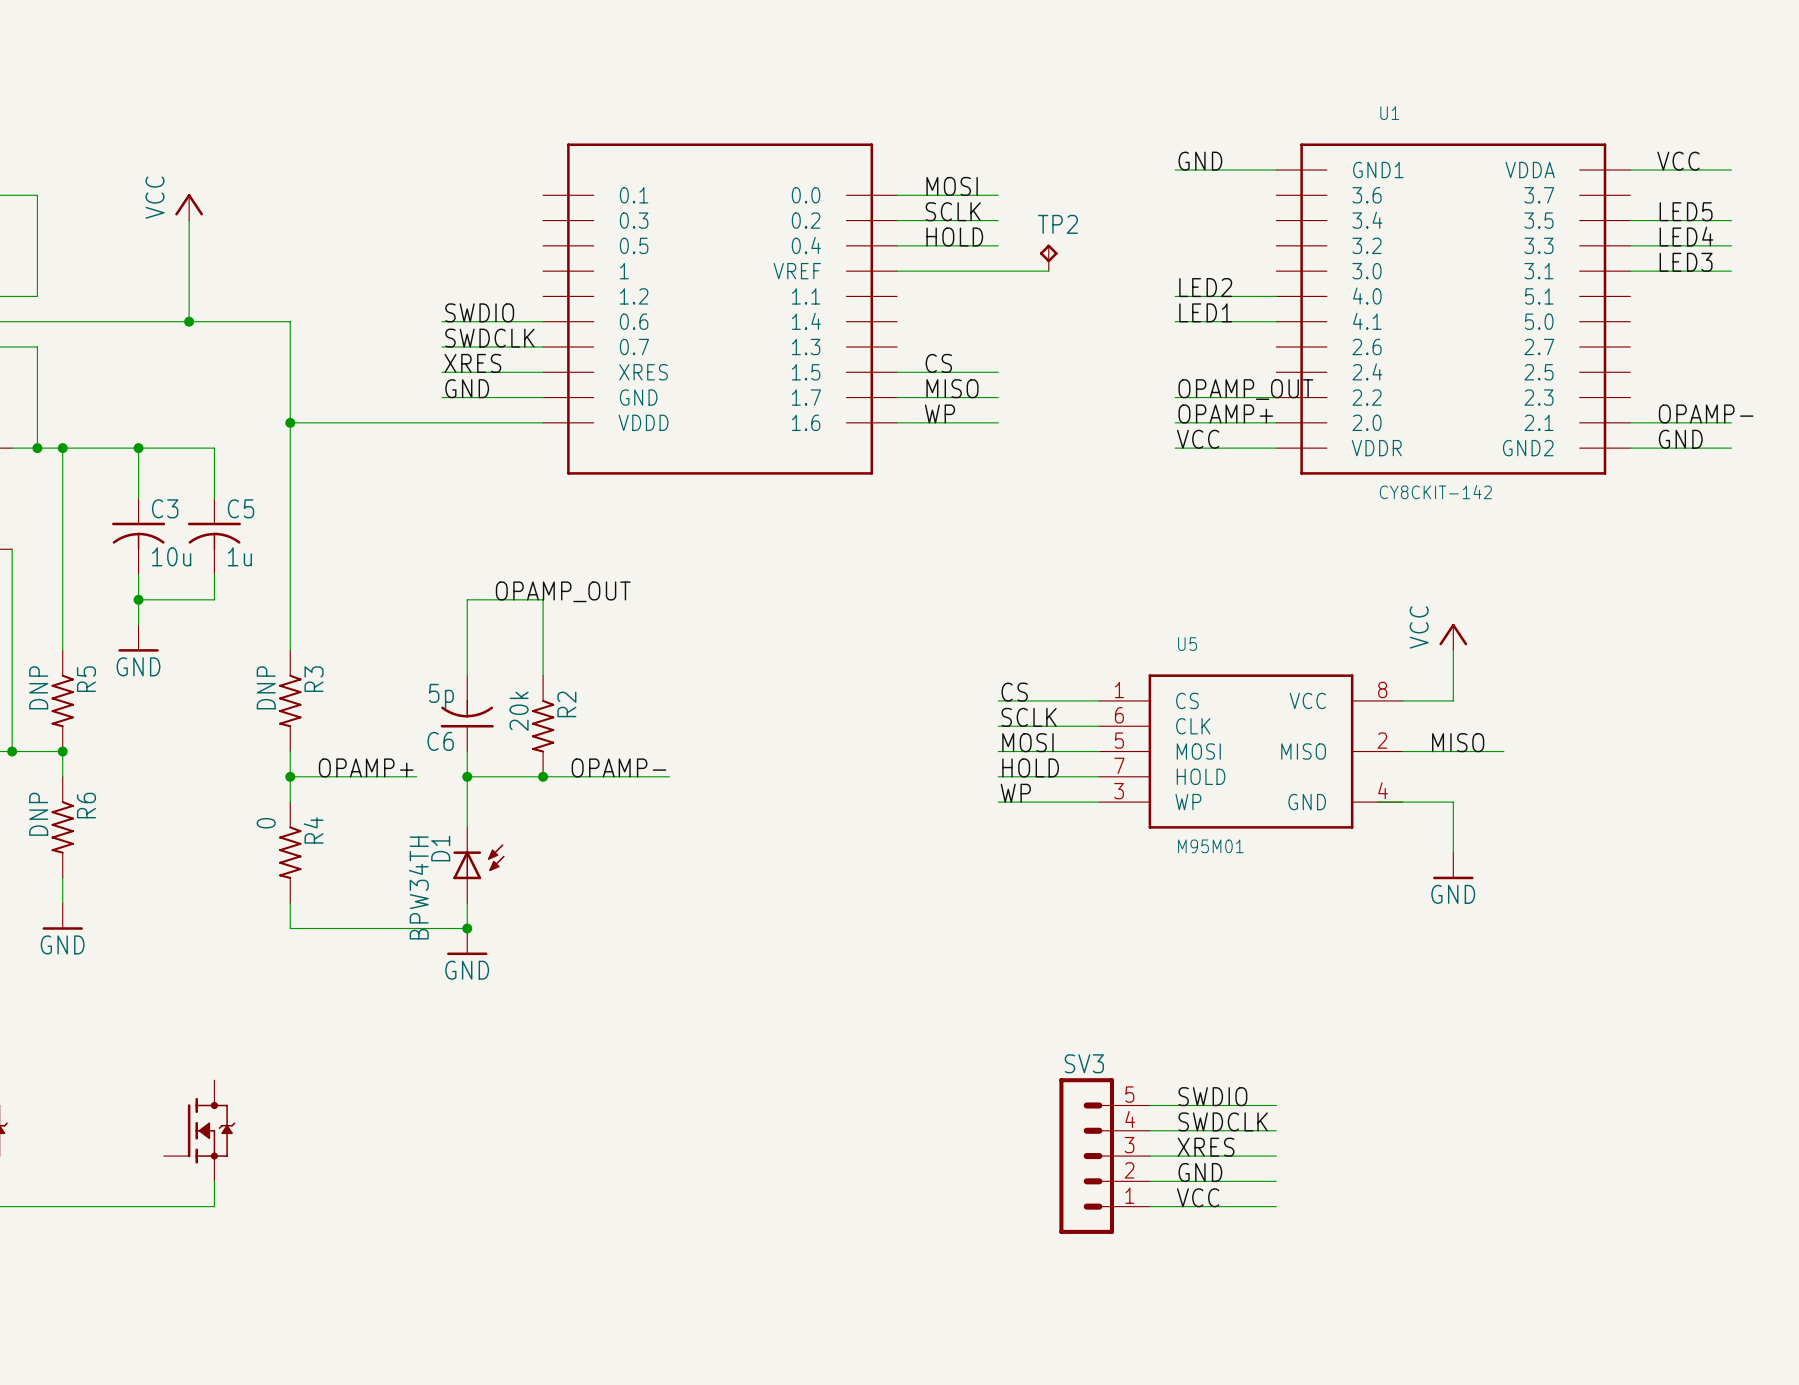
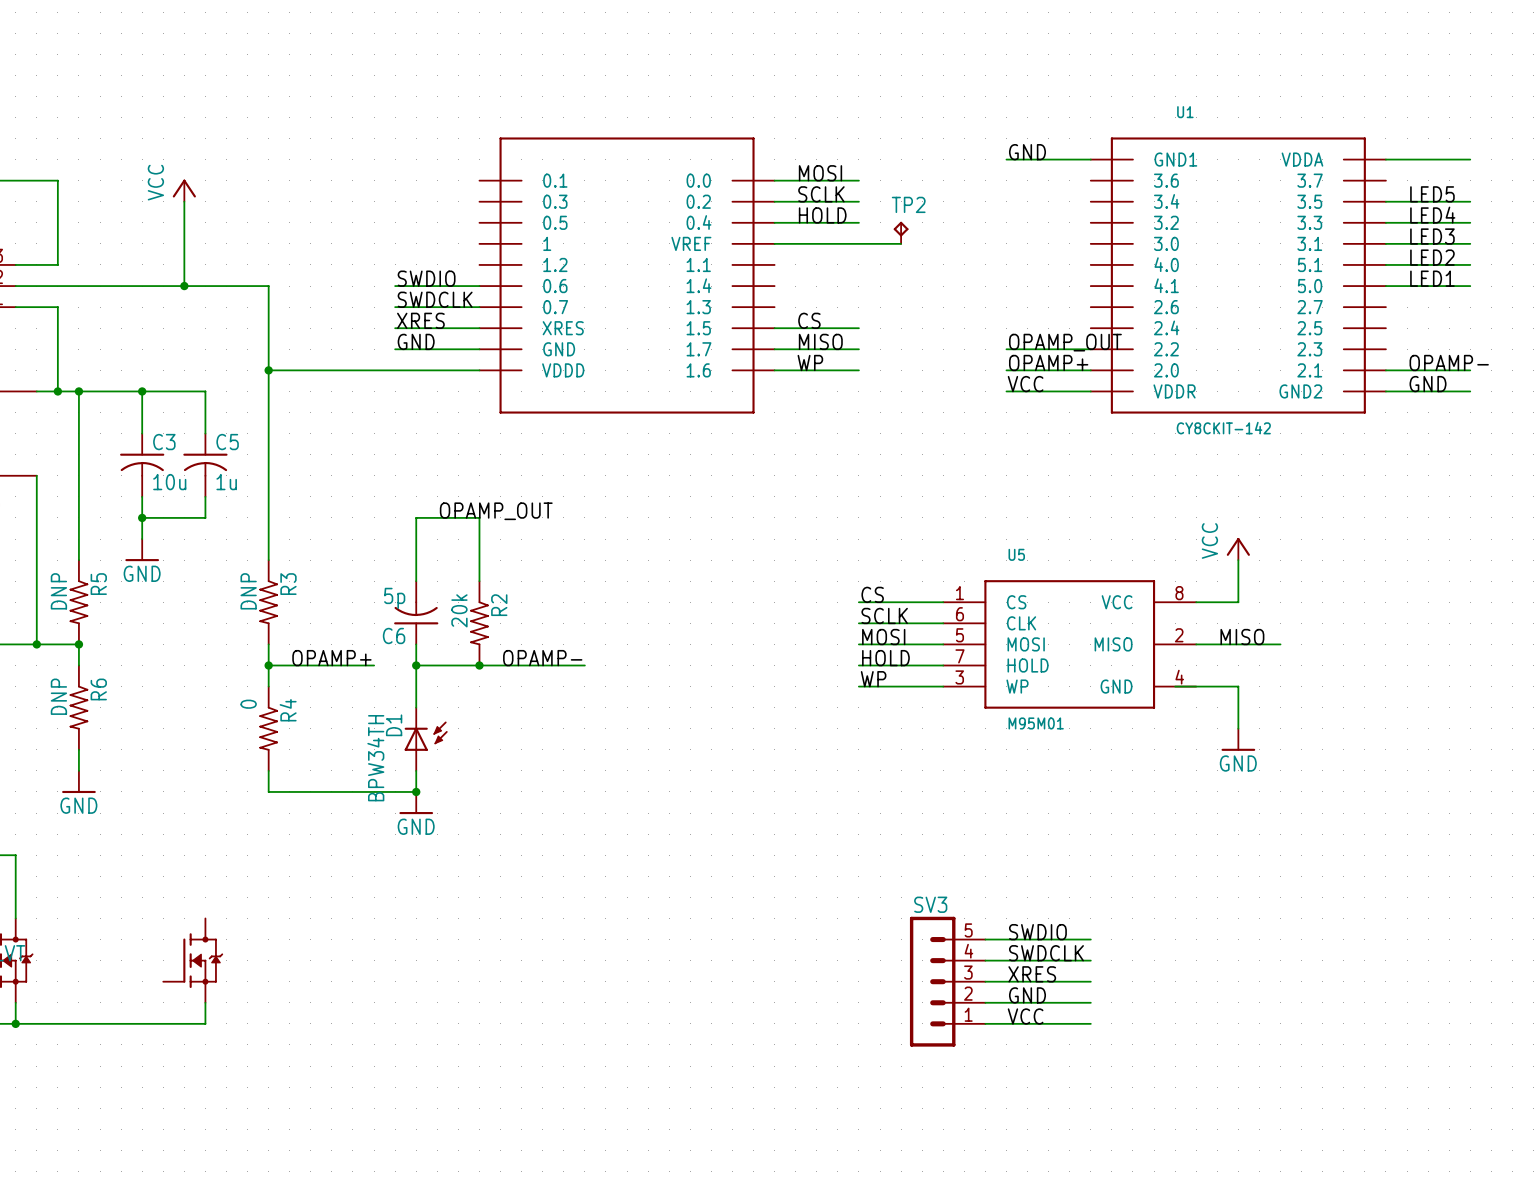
label: VCC (1678, 161) -> none
label: LED2 (1205, 287) -> none
label: none -> LED2 (1432, 257)
wire: (1175, 296) (1276, 296) -> none
wire: none -> (1385, 264) (1470, 264)
label: LED1 (1205, 312) -> none
label: none -> LED1 (1432, 278)
wire: (1175, 321) (1276, 321) -> none
wire: none -> (1385, 286) (1470, 286)

